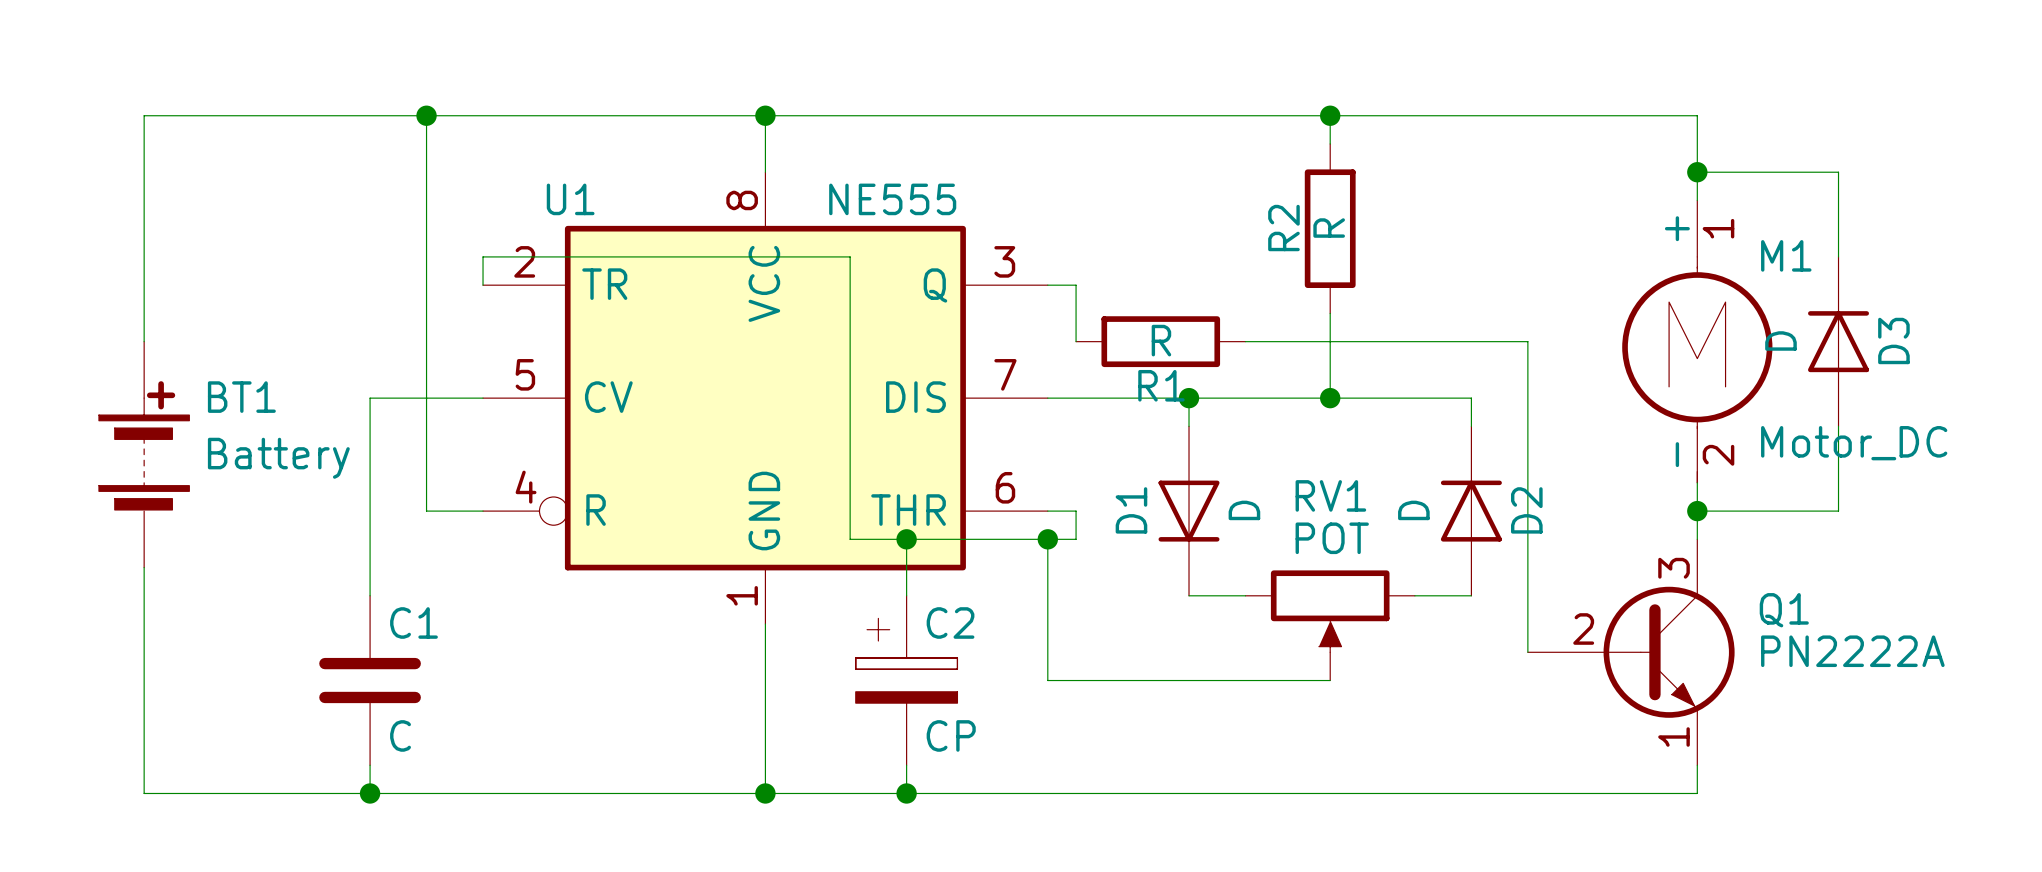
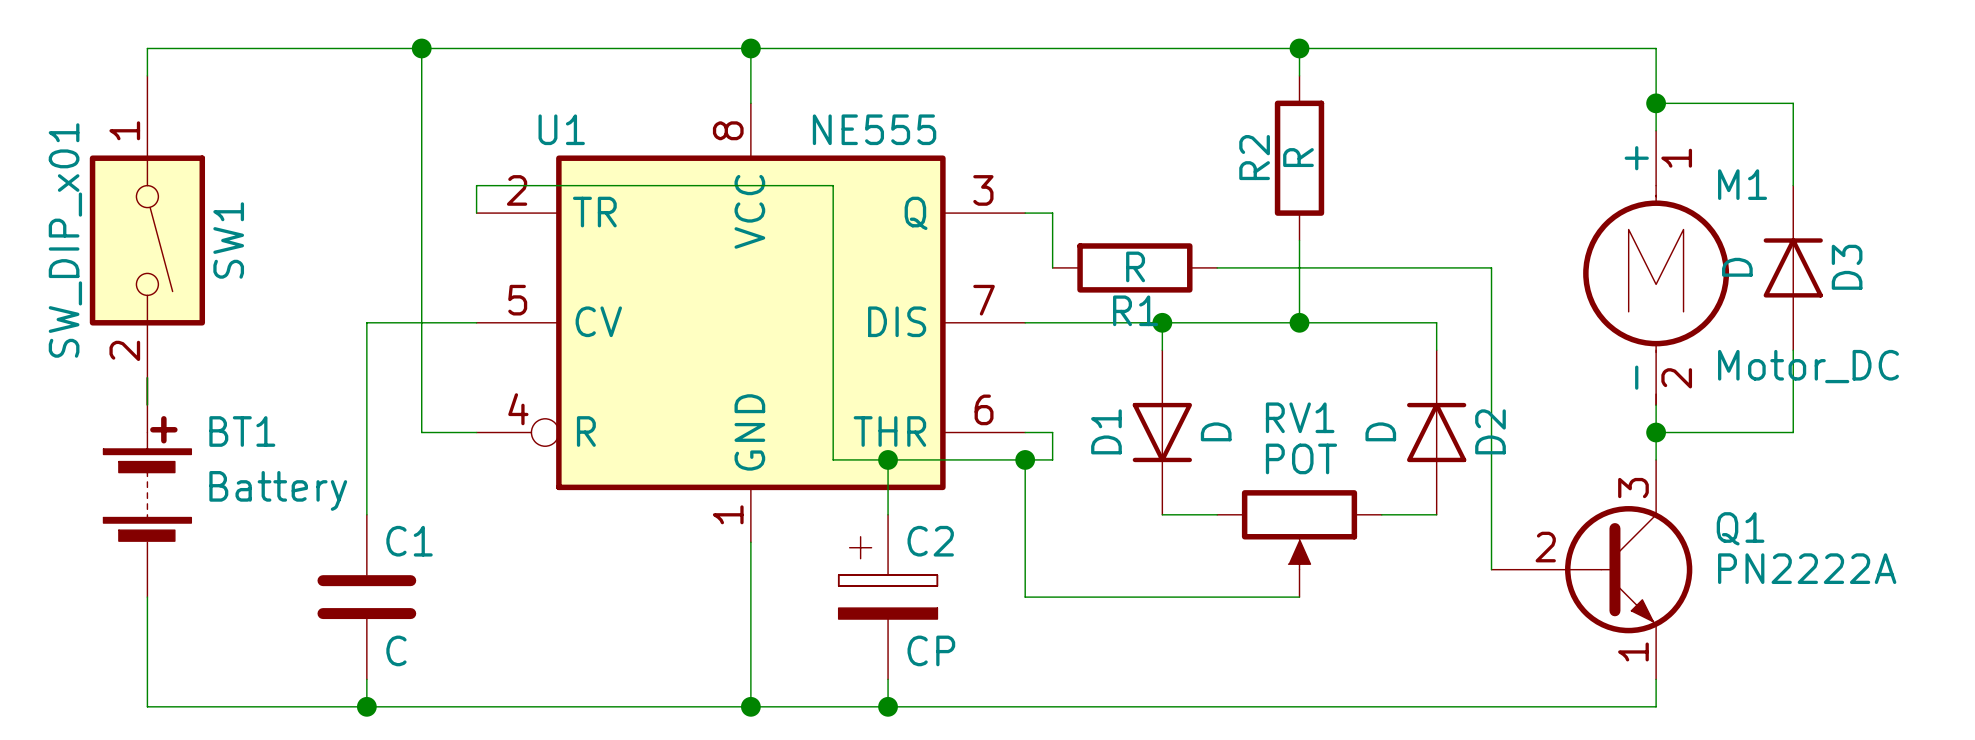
SW1: none -> SW_DIP_x01 (147, 240)
BT1 position: (144, 454) -> (147, 487)

